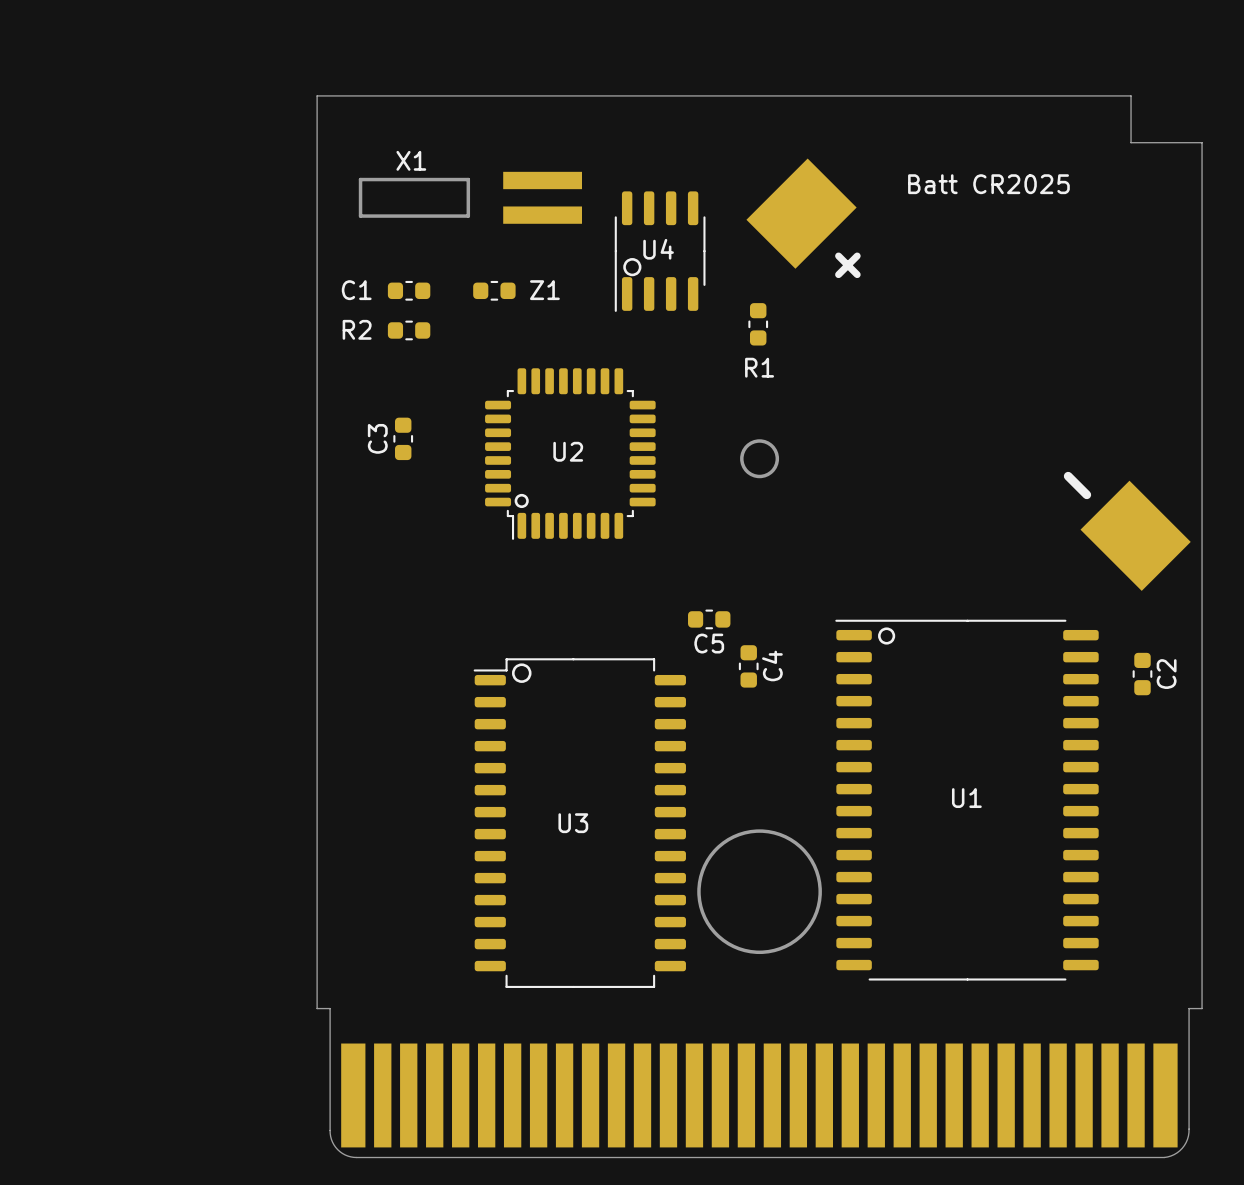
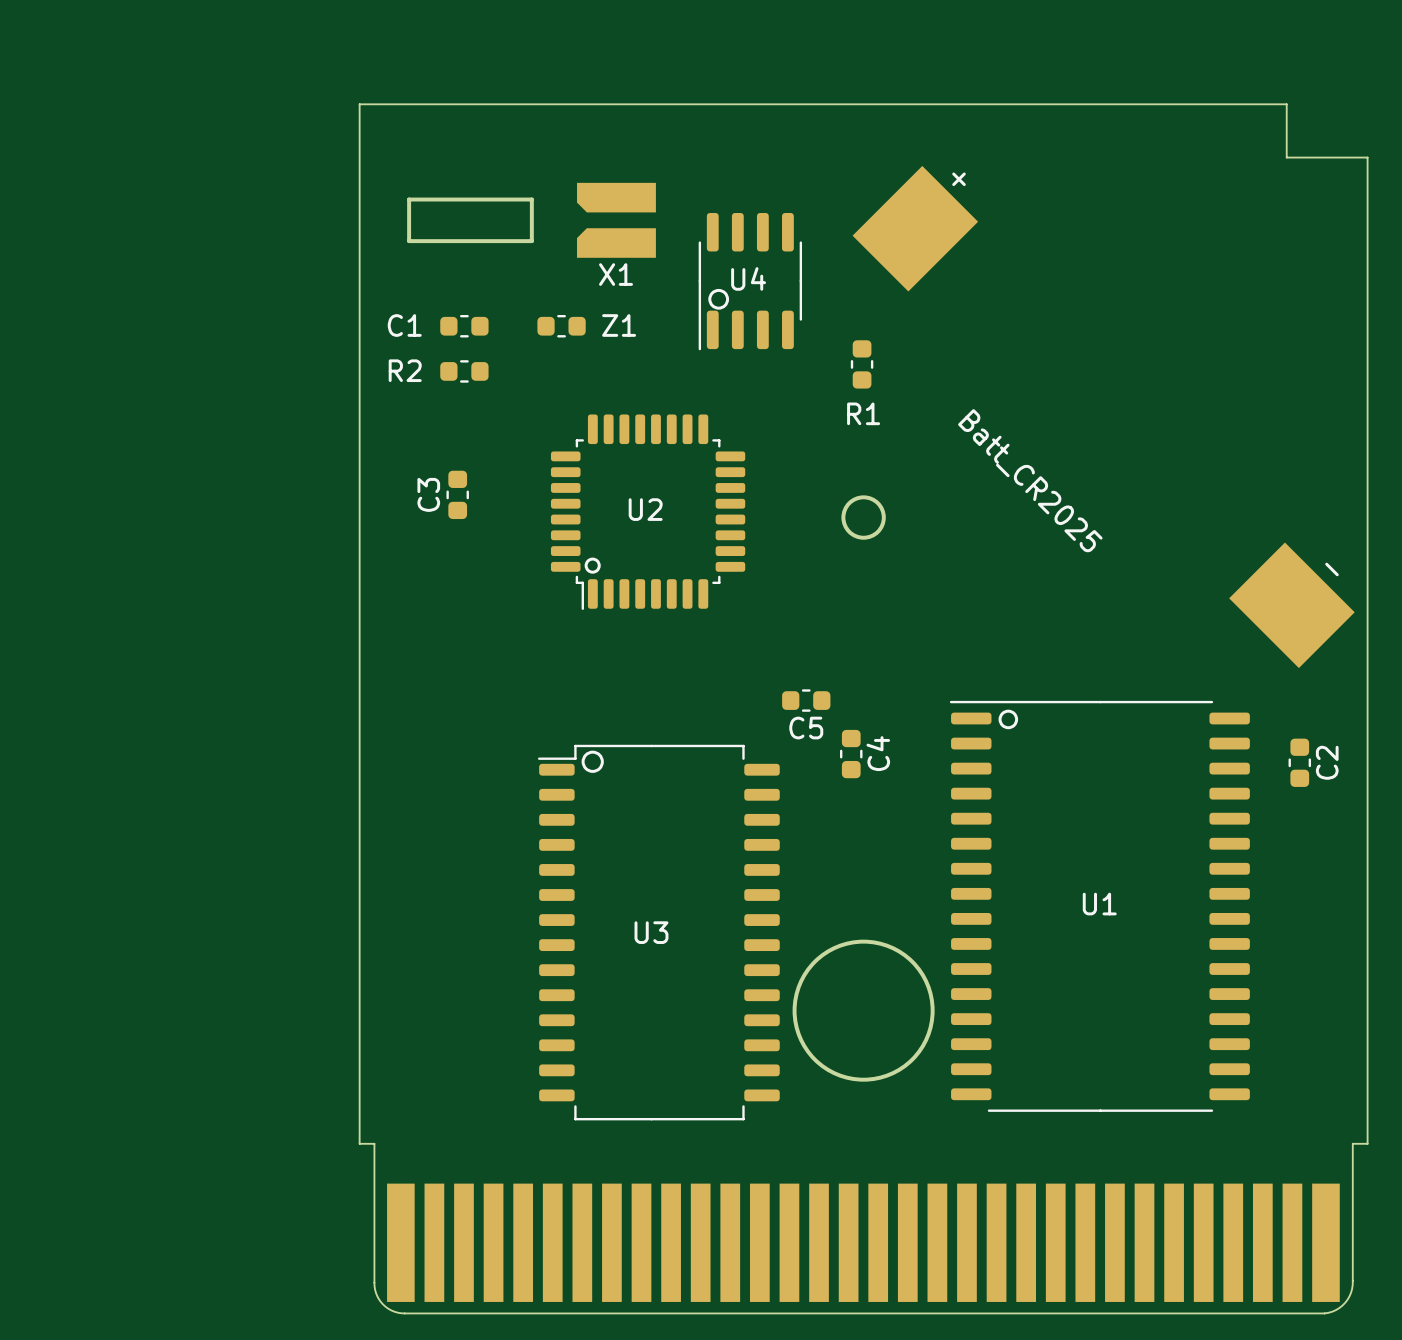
X1 name position: X1 (411, 160) -> X1 (616, 274)
X1 footprint: [503, 171, 582, 224] -> [577, 182, 656, 258]
Batt_CR2025: none -> (1103, 417)
Batt CR2025: (968, 374) -> none

